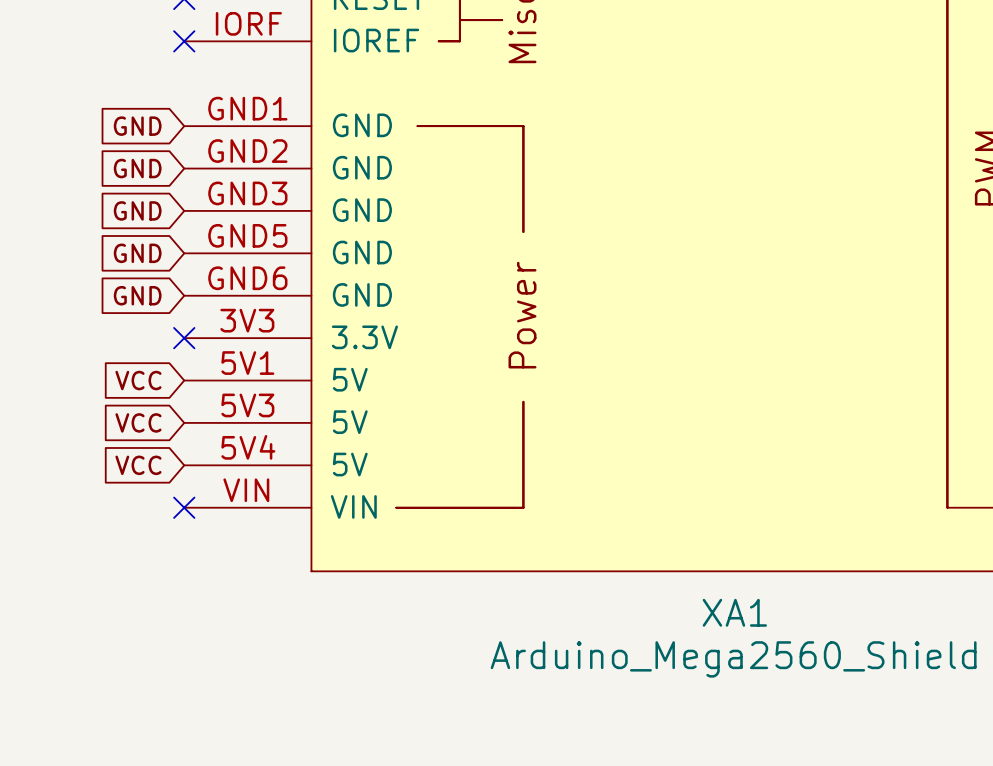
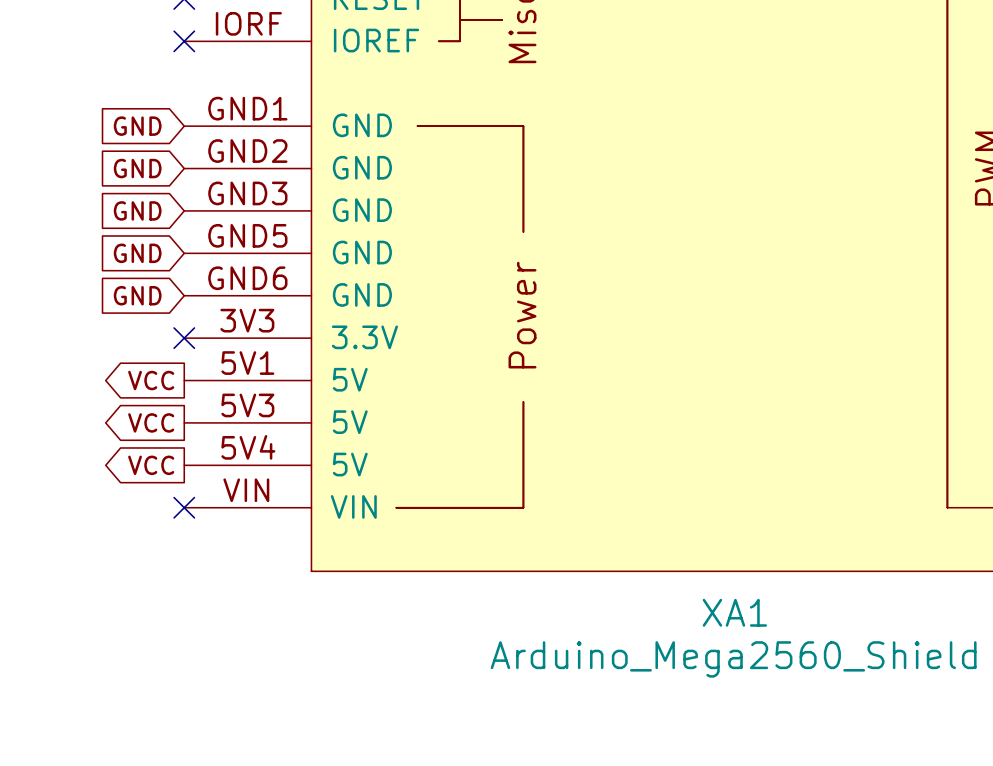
global label shape: input (138, 380) -> output (151, 380)
global label shape: input (138, 422) -> output (151, 422)
global label shape: input (138, 465) -> output (151, 465)

